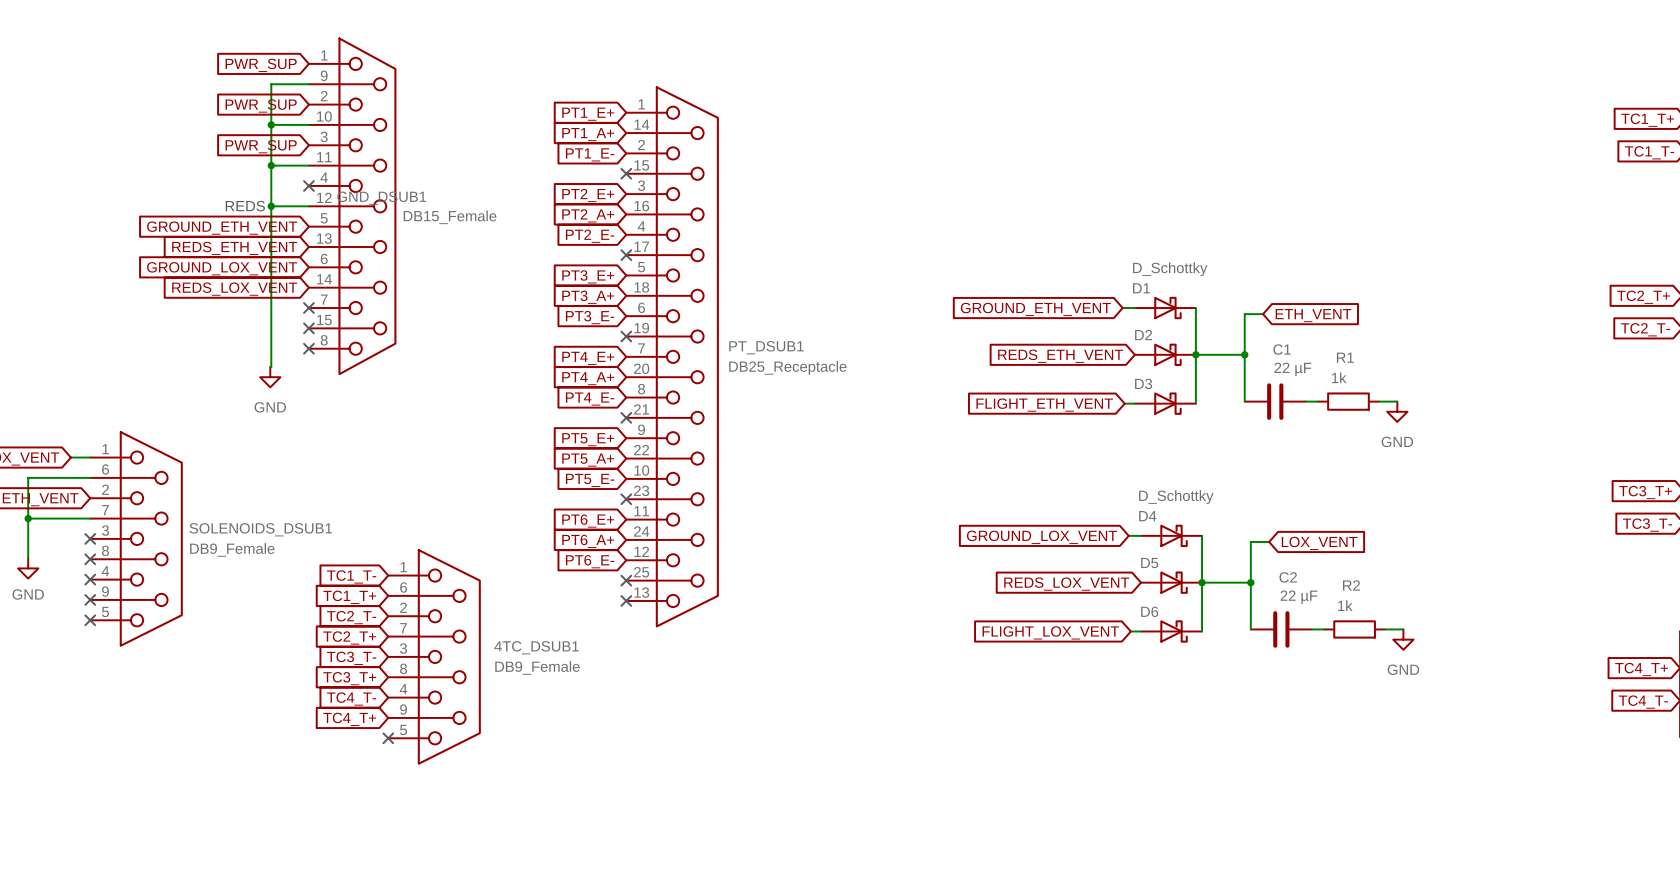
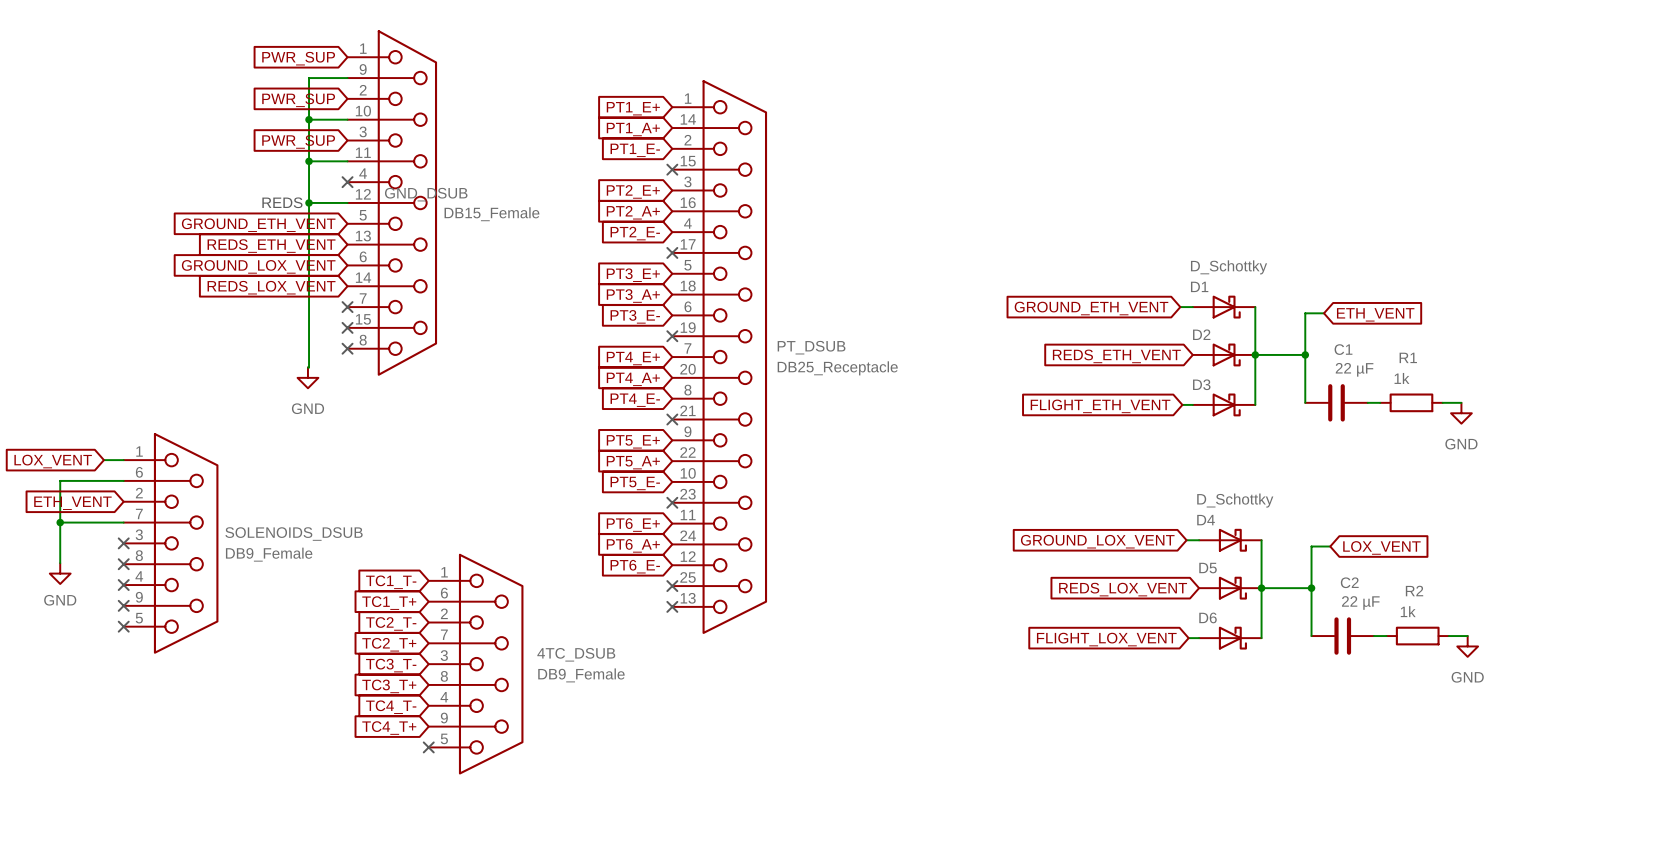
GND_DSUB1 name: GND_DSUB1 (381, 198) -> GND_DSUB (426, 194)
PT_DSUB1 name: PT_DSUB1 (766, 347) -> PT_DSUB (811, 347)
SOLENOIDS_DSUB1 name: SOLENOIDS_DSUB1 (260, 529) -> SOLENOIDS_DSUB (294, 534)
4TC_DSUB1 name: 4TC_DSUB1 (536, 647) -> 4TC_DSUB (576, 654)

